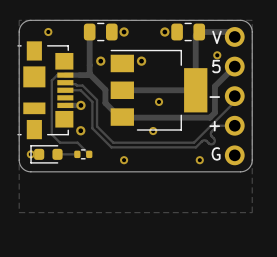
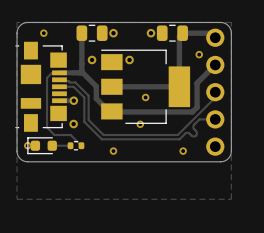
text: V (216, 37) -> none
text: 5 (216, 66) -> none
text: - (214, 97) -> none
text: + (214, 126) -> none
text: G (216, 153) -> none

